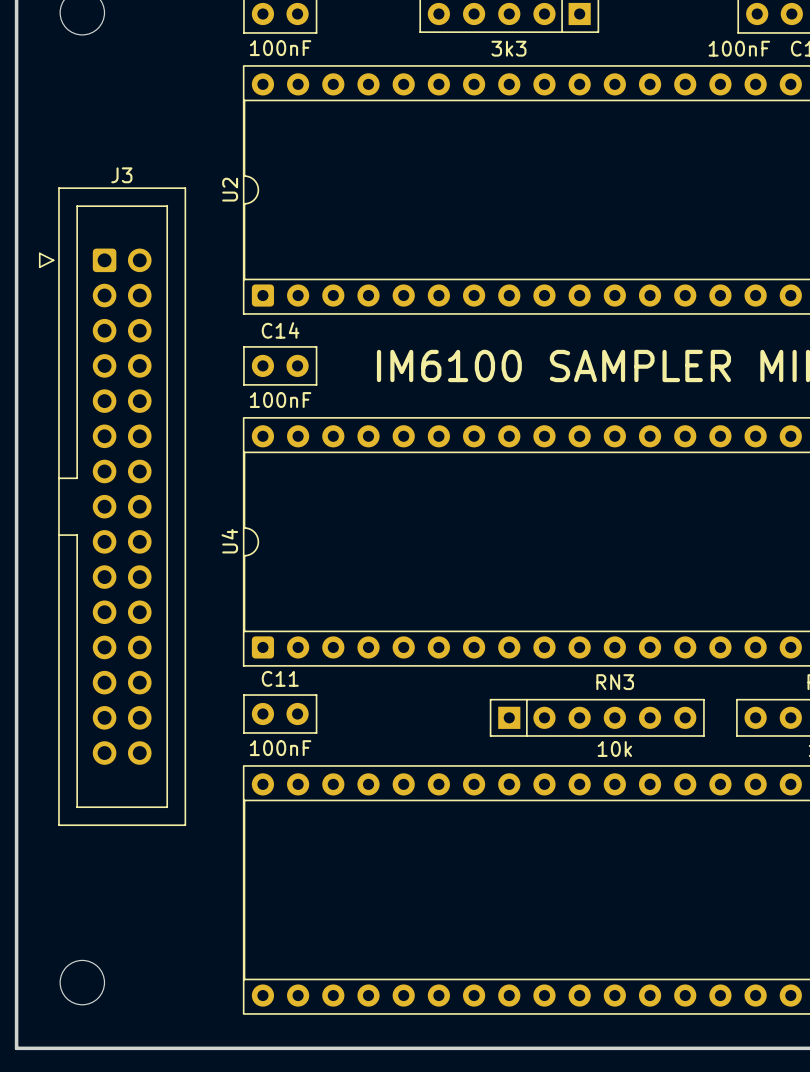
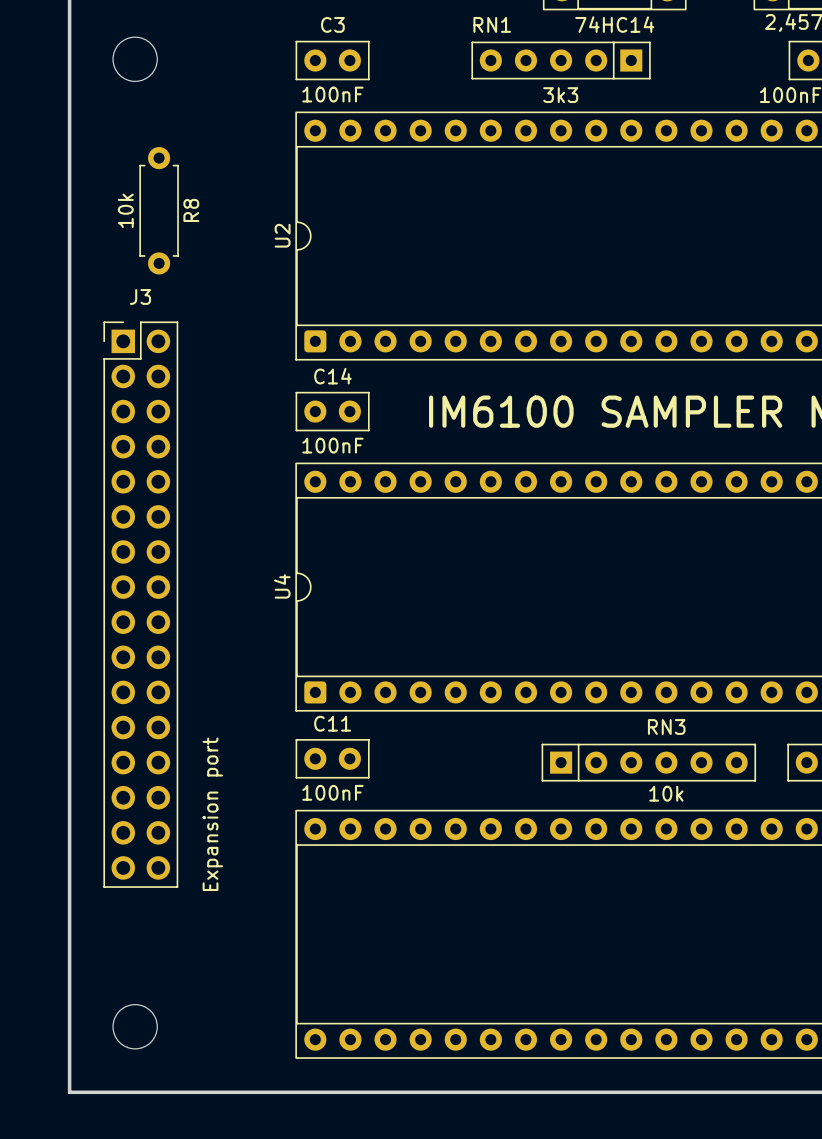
R8: none -> 10k (159, 210)
J3 footprint: [38, 187, 187, 827] -> [103, 321, 179, 888]
J3 value: none -> Expansion port (212, 814)

